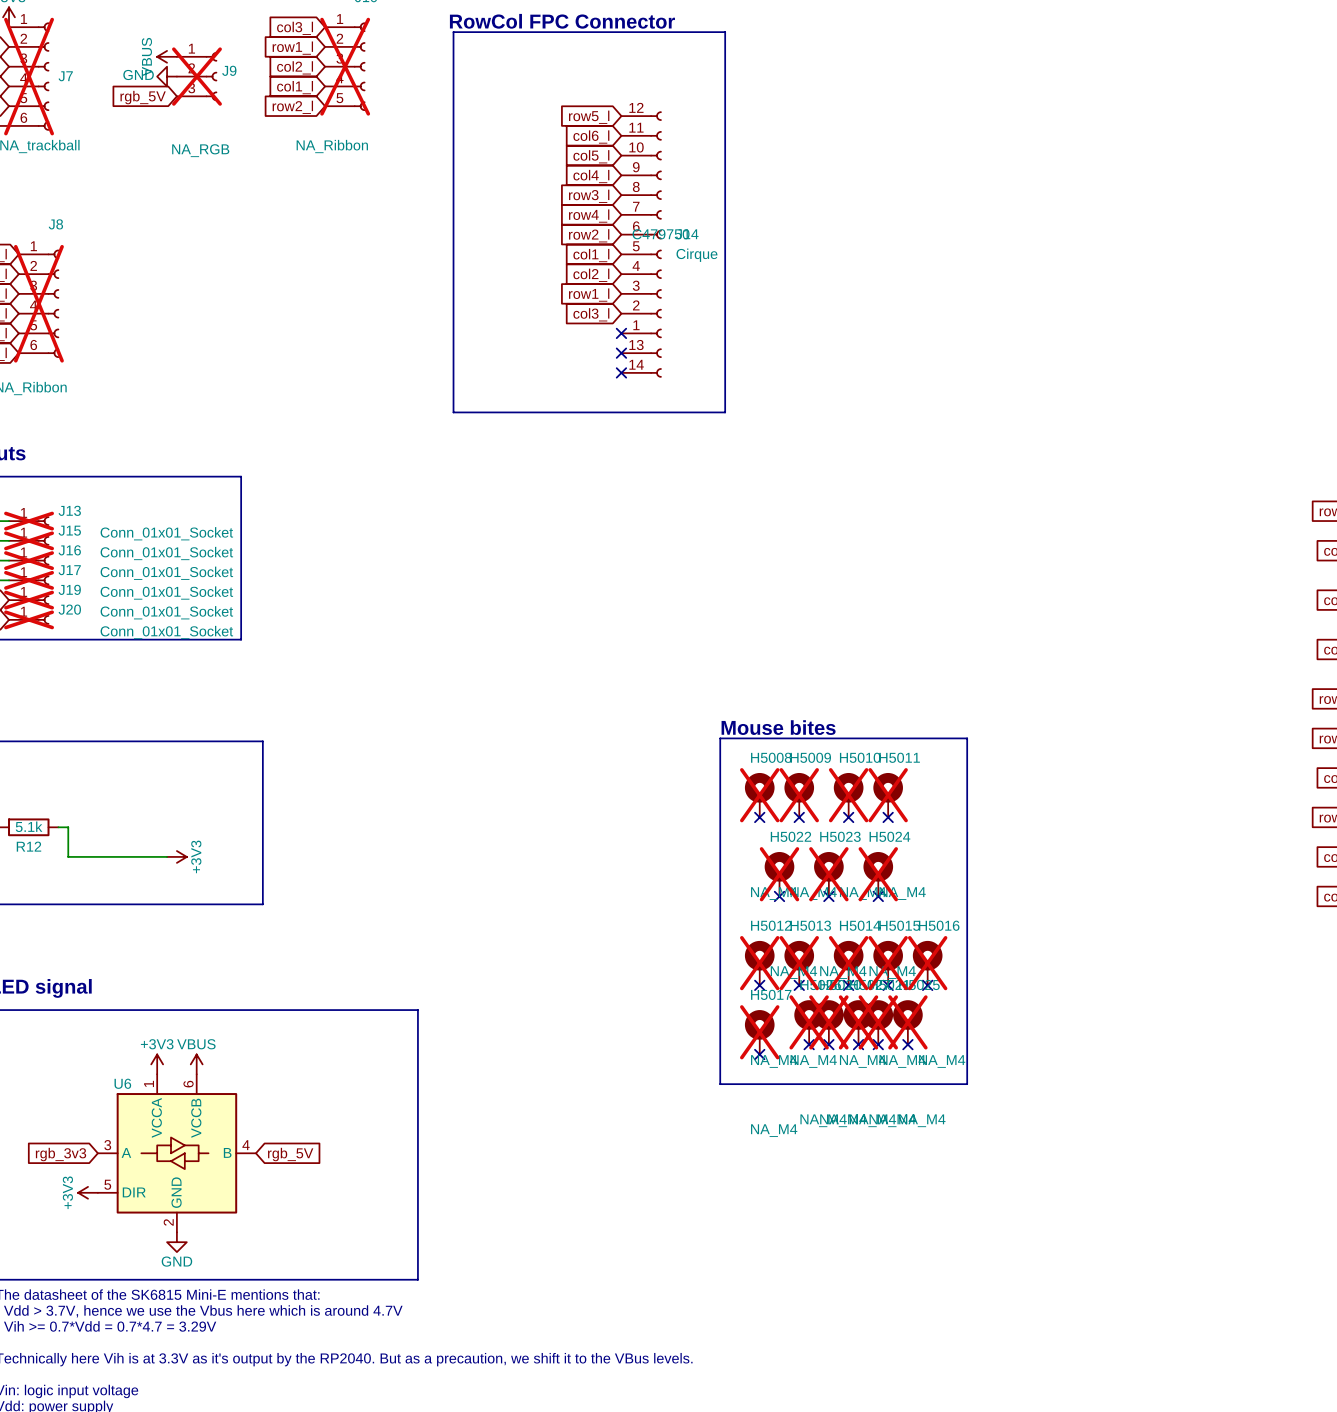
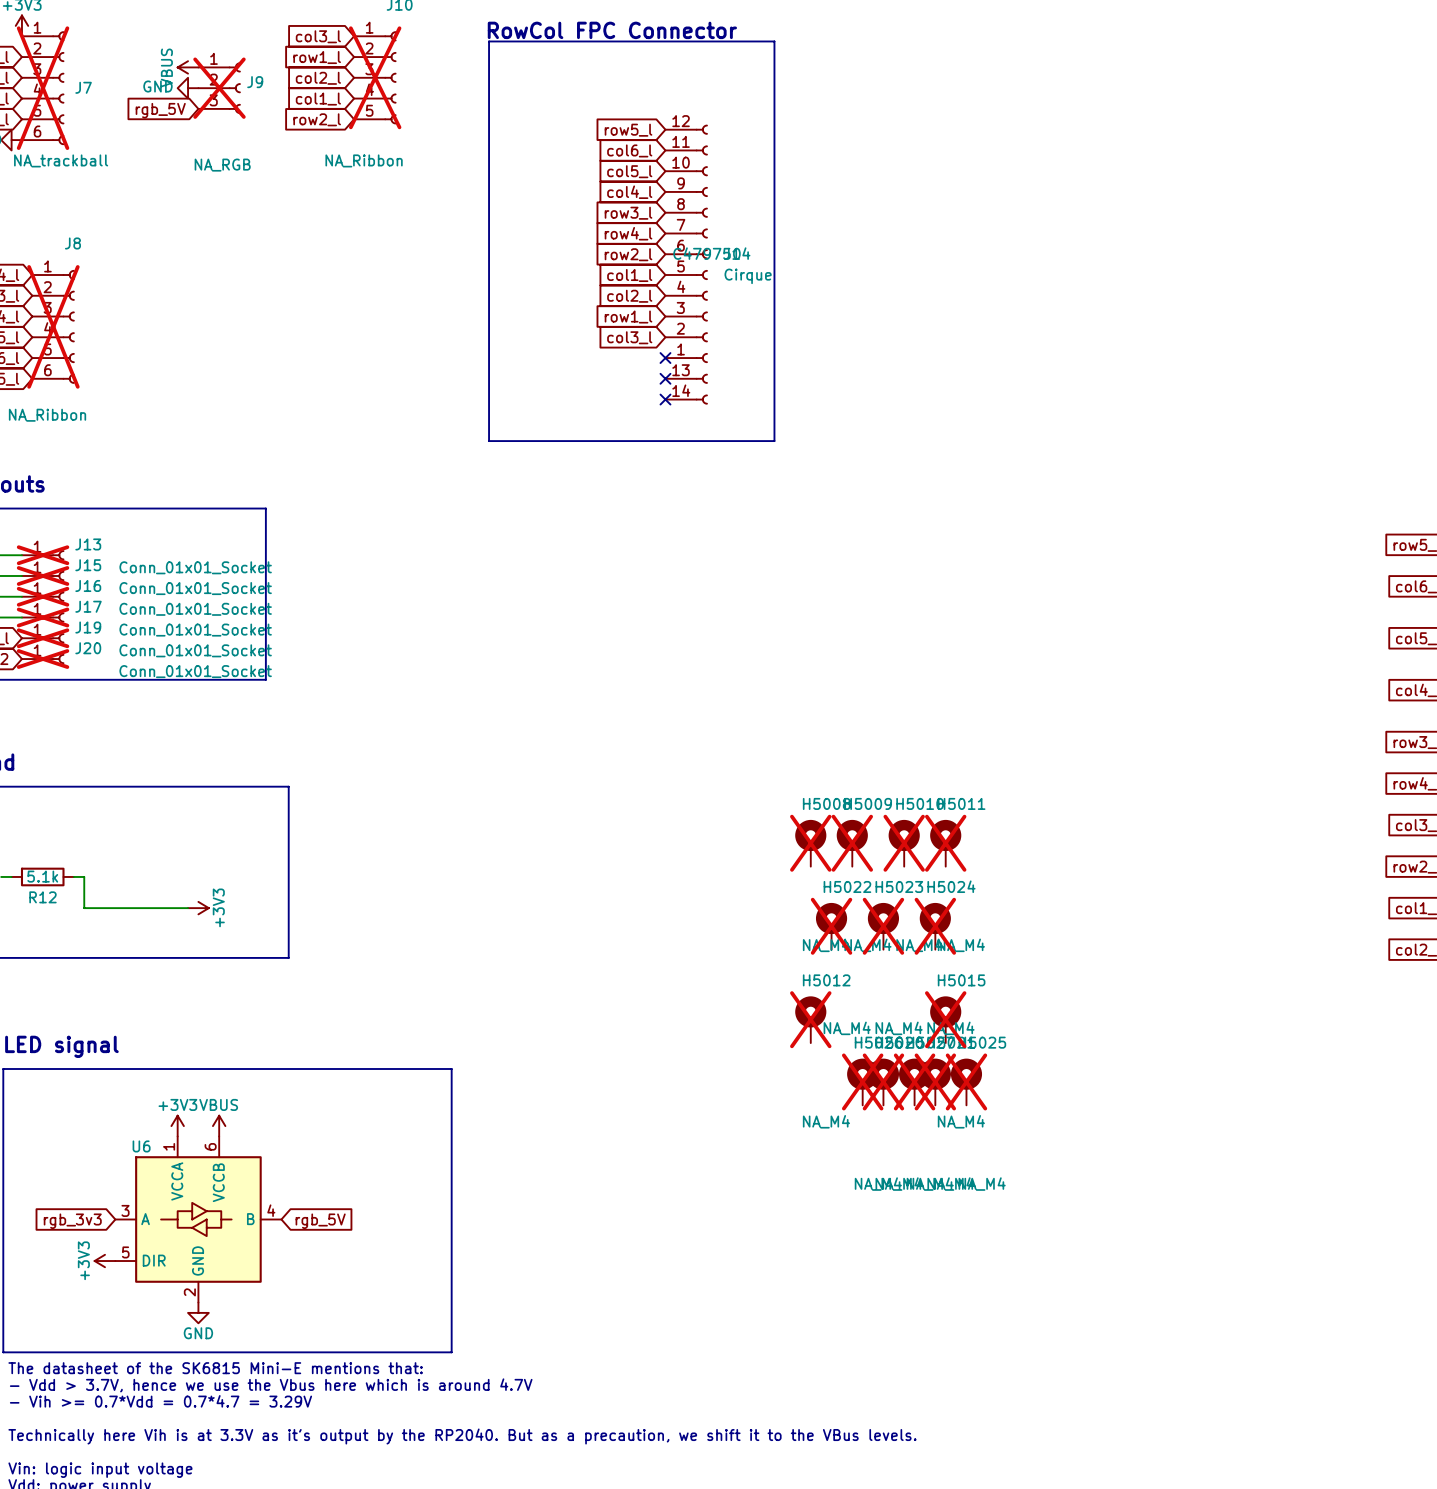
text: Mouse bites (778, 727) -> none
line: (720, 738) (967, 738) (967, 1084) (720, 1084) (720, 738) -> none
no-connect mark: (759, 817) -> none
no-connect mark: (799, 817) -> none
no-connect mark: (848, 817) -> none
no-connect mark: (888, 817) -> none
no-connect mark: (779, 896) -> none
no-connect mark: (828, 896) -> none
no-connect mark: (878, 896) -> none
H5013: NA_M4 (799, 963) -> none
H5014: NA_M4 (848, 963) -> none
H5016: NA_M4 (927, 963) -> none
no-connect mark: (759, 985) -> none
no-connect mark: (799, 985) -> none
no-connect mark: (848, 985) -> none
no-connect mark: (888, 985) -> none
no-connect mark: (927, 985) -> none
H5017: NA_M4 (759, 1032) -> none
no-connect mark: (809, 1044) -> none
no-connect mark: (828, 1044) -> none
no-connect mark: (858, 1044) -> none
no-connect mark: (878, 1044) -> none
no-connect mark: (907, 1044) -> none
no-connect mark: (759, 1054) -> none

